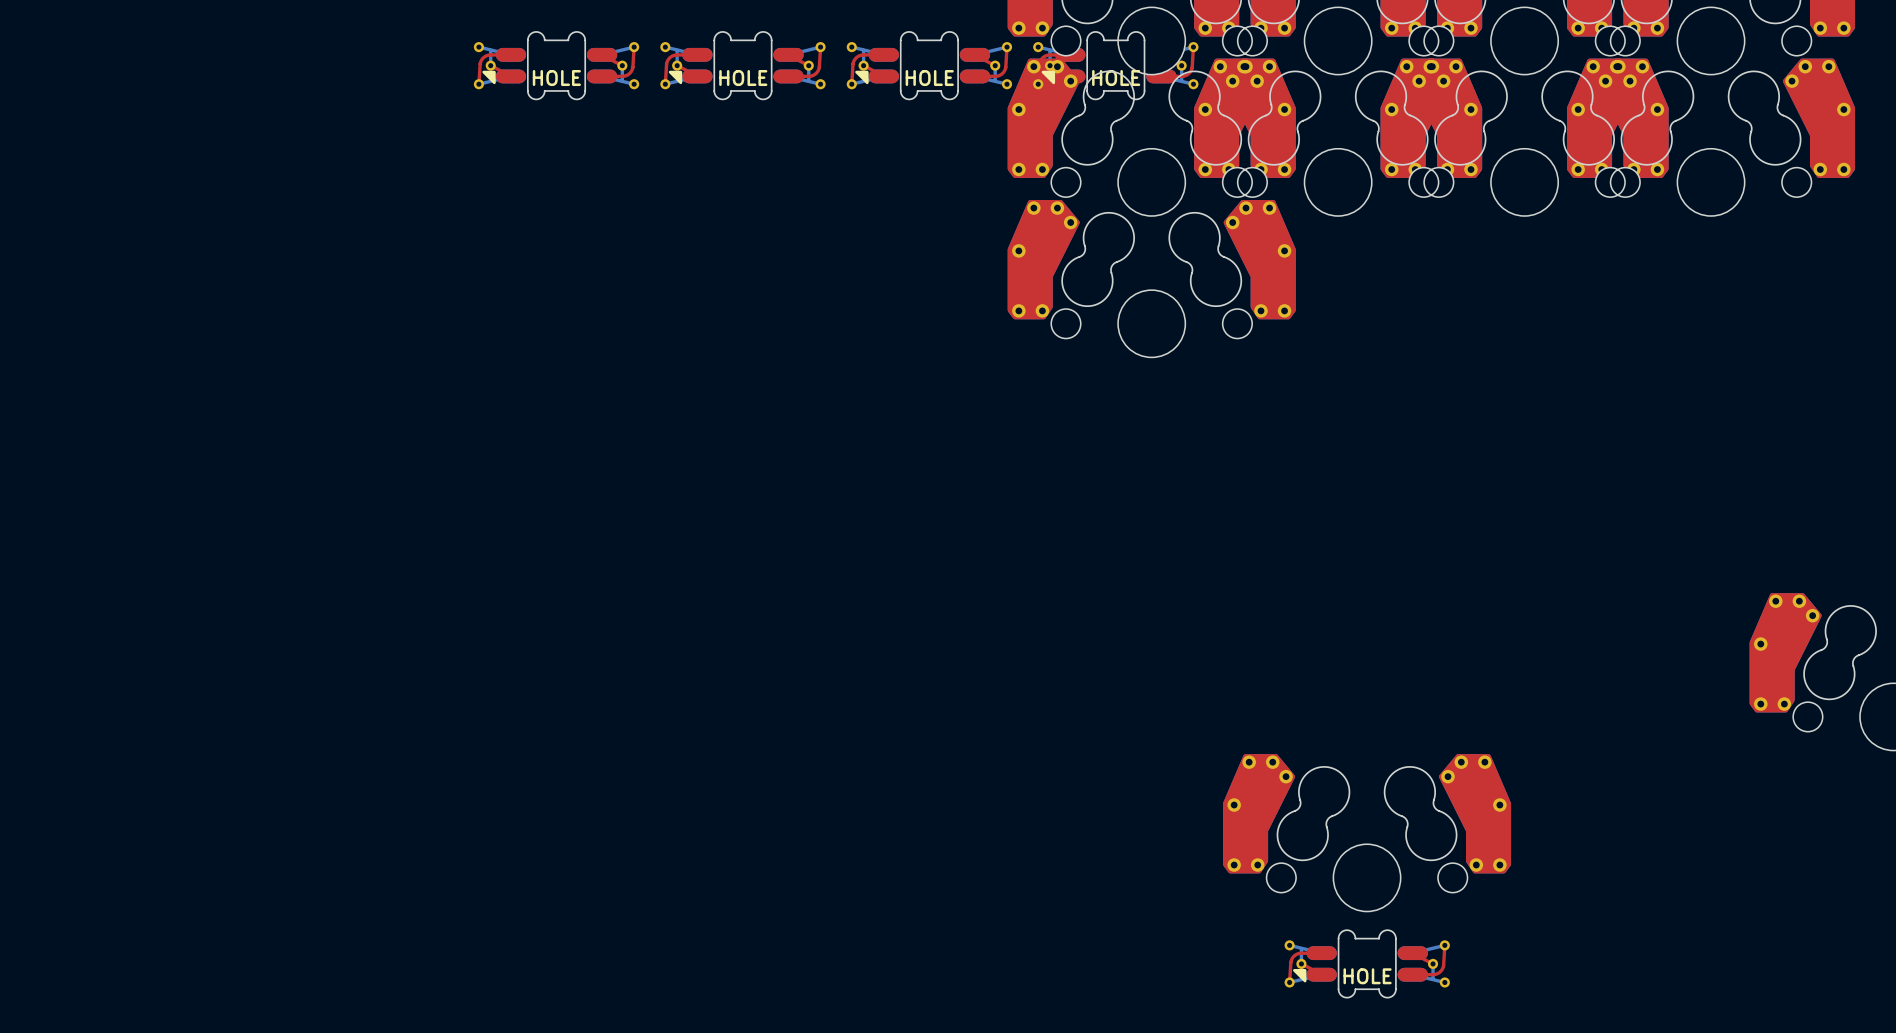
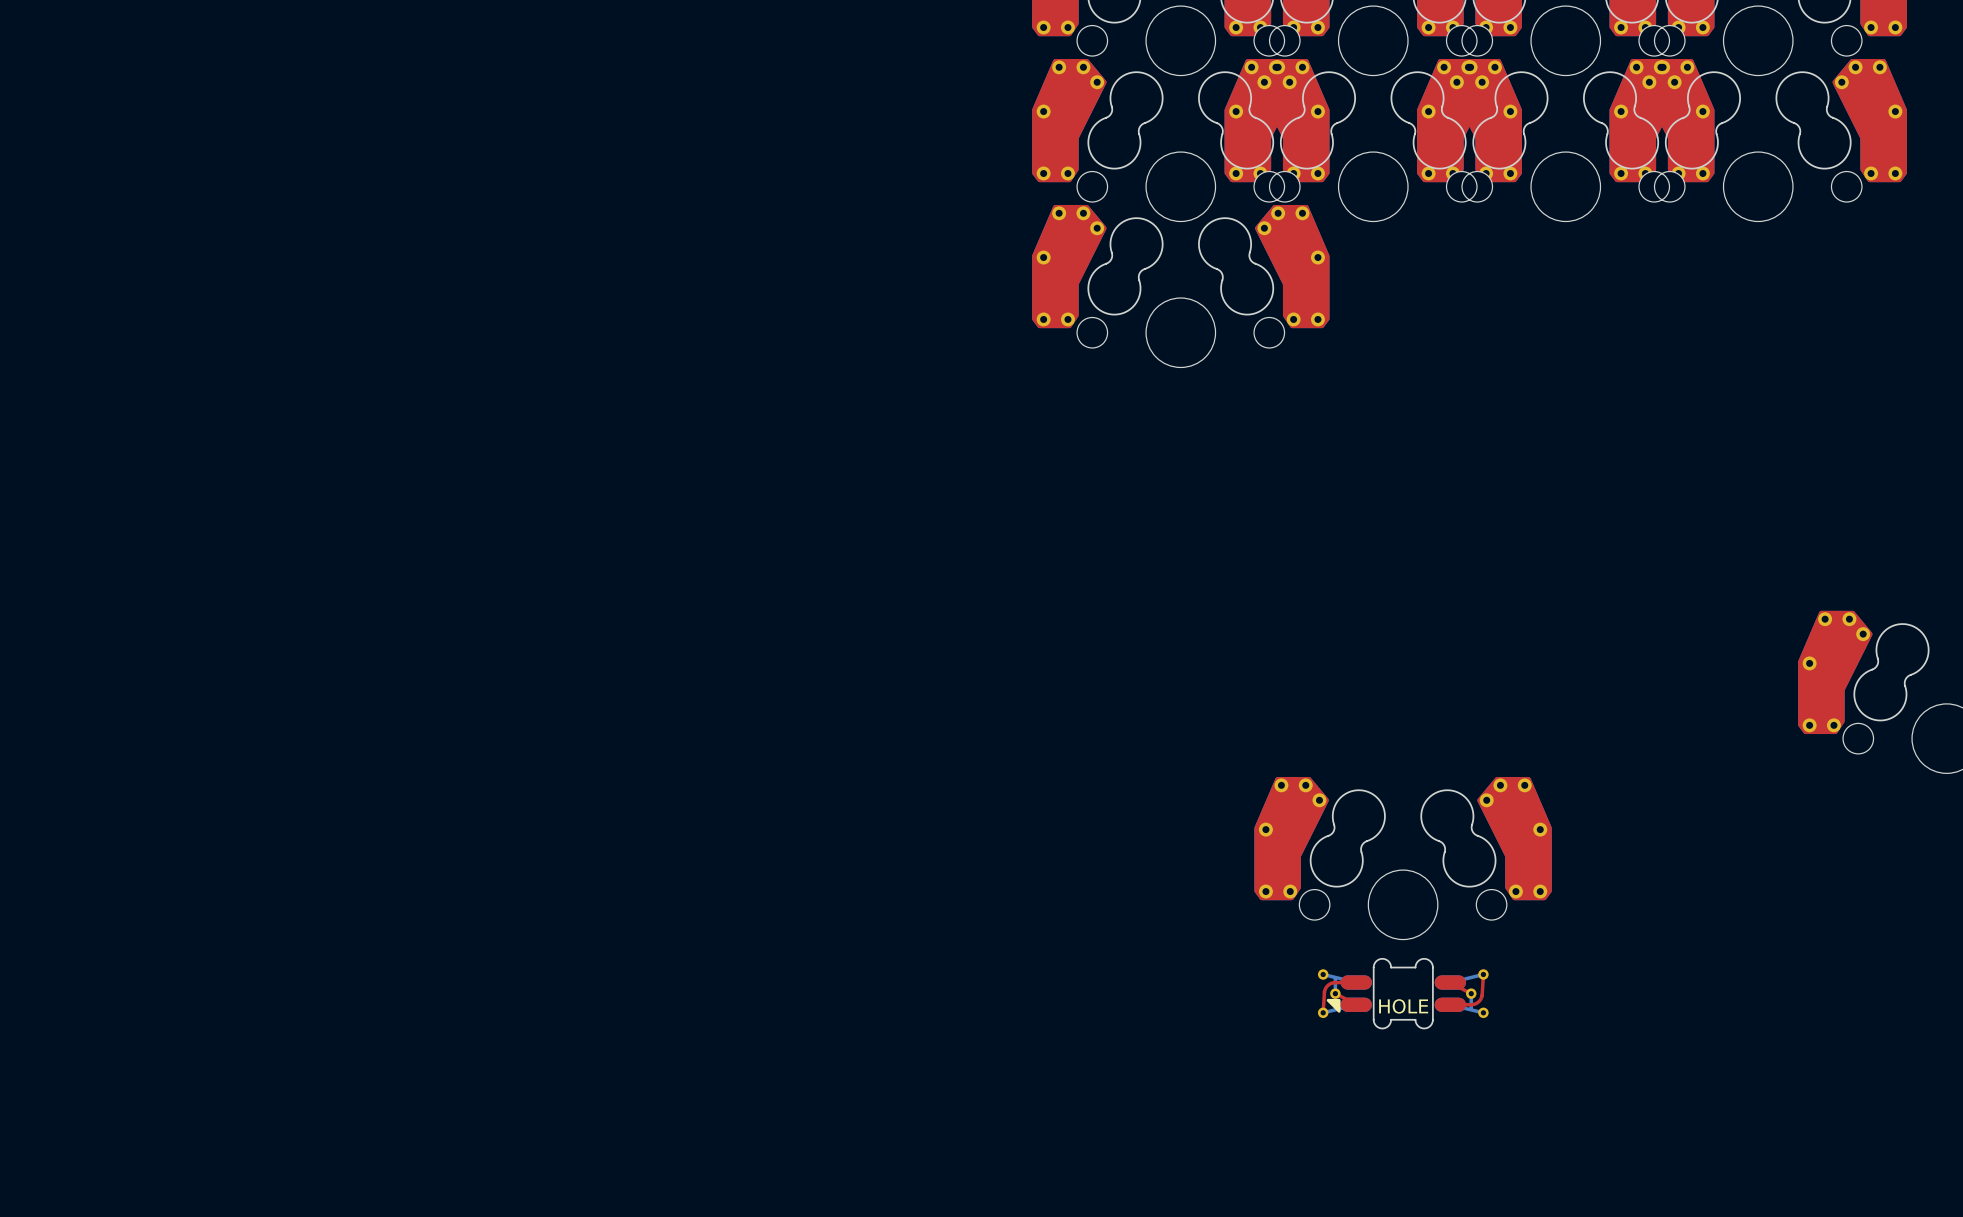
part: (556, 65) -> none
part: (742, 65) -> none
part: (929, 65) -> none
part: (1115, 65) -> none

